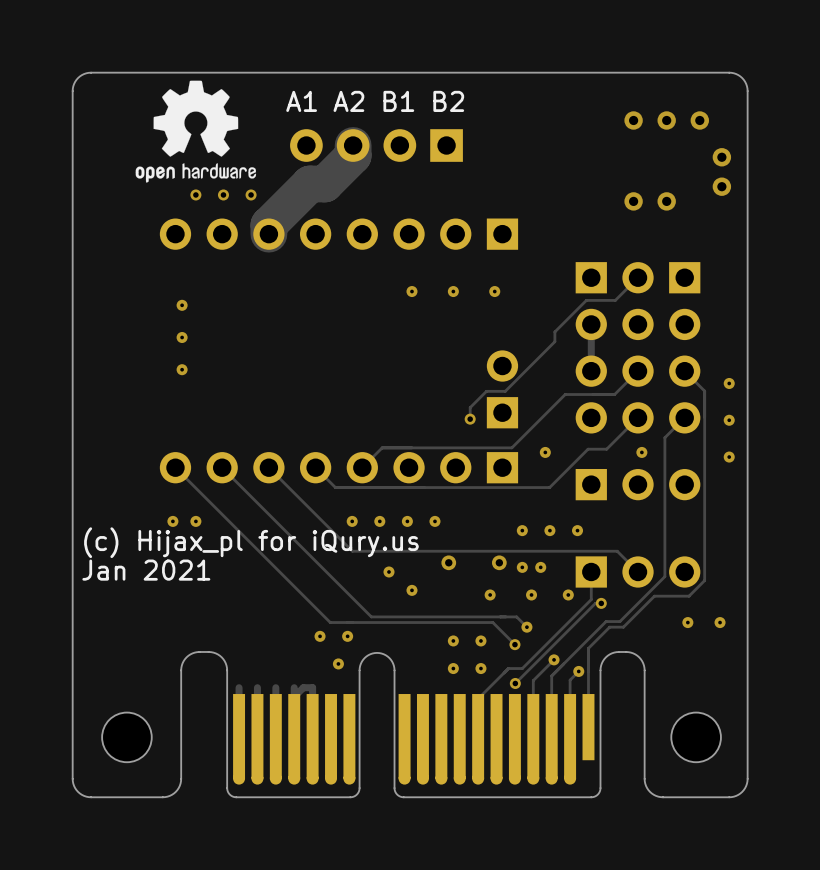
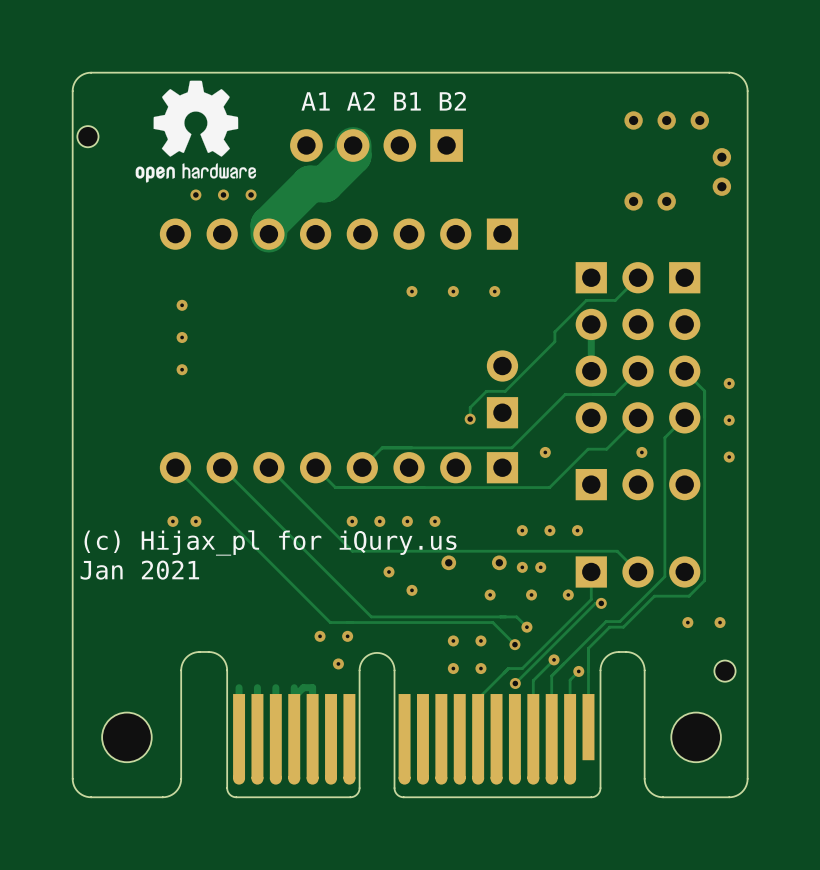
part: none -> (87, 136)
part: none -> (725, 671)

